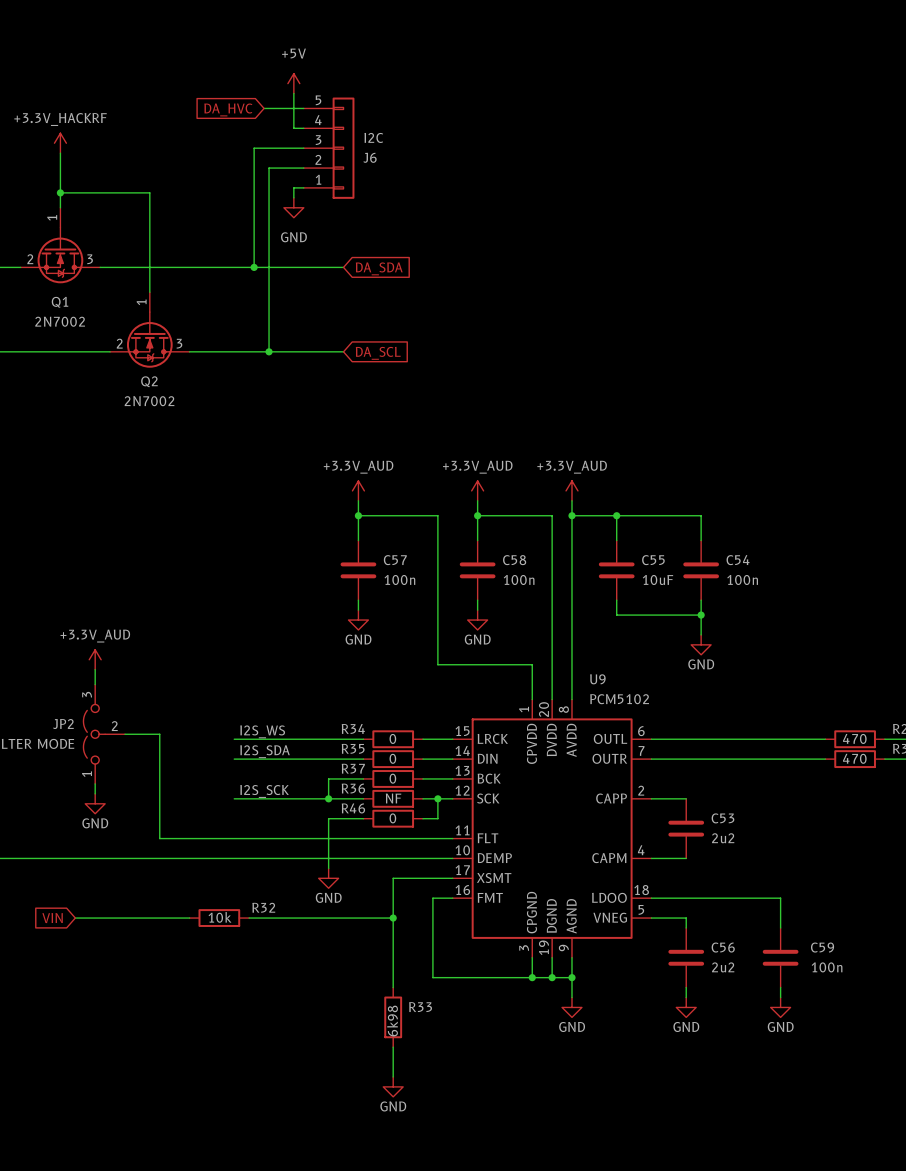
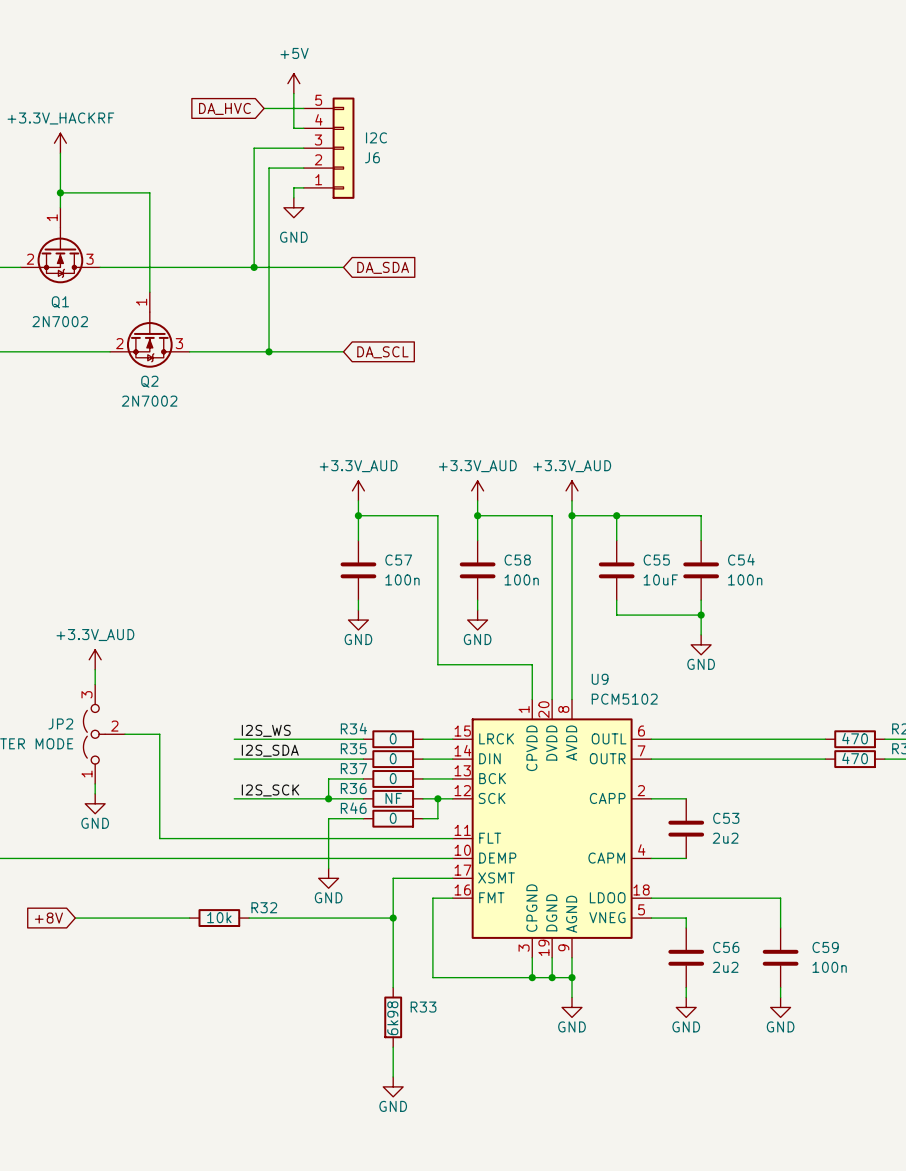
global label: VIN (52, 918) -> +8V (48, 918)

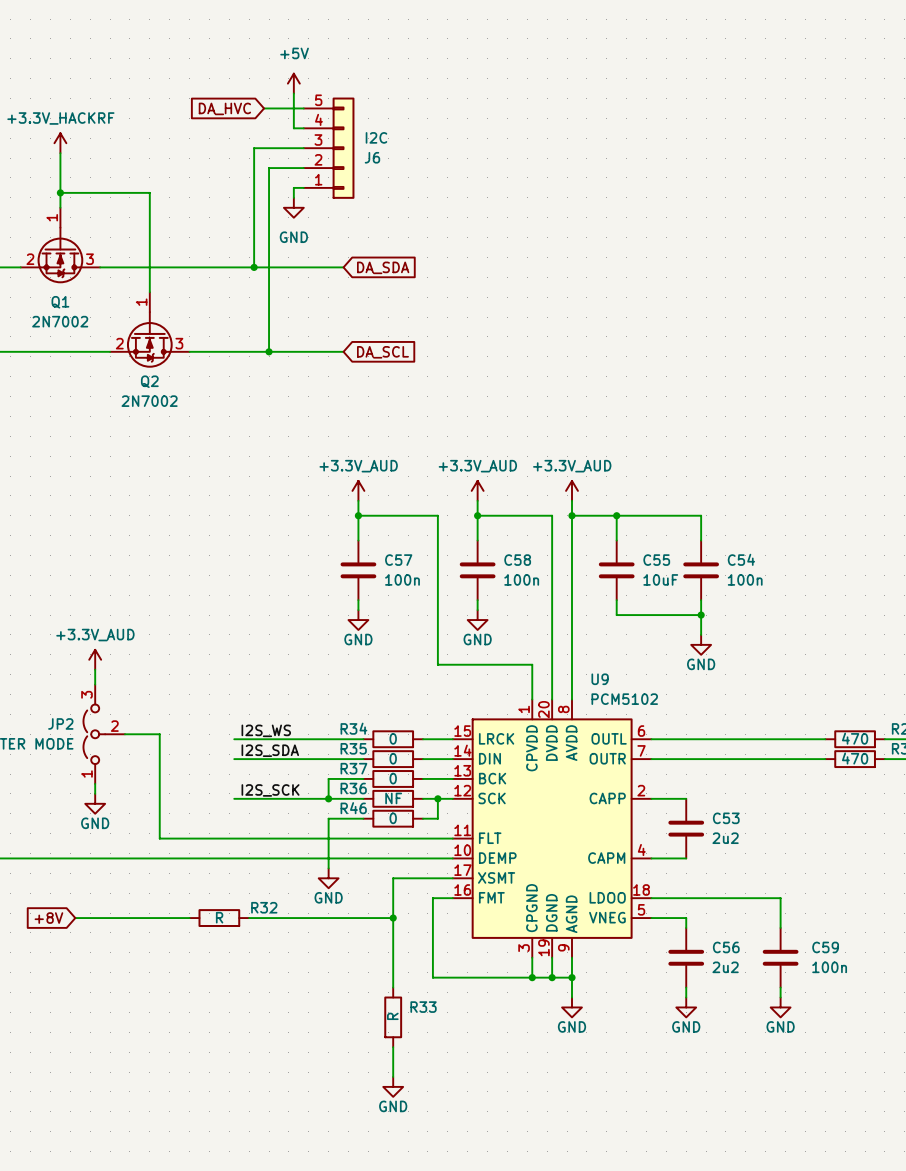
R32 value: 10k (219, 917) -> R (219, 917)
R33 value: 6k98 (392, 1018) -> R (392, 1016)

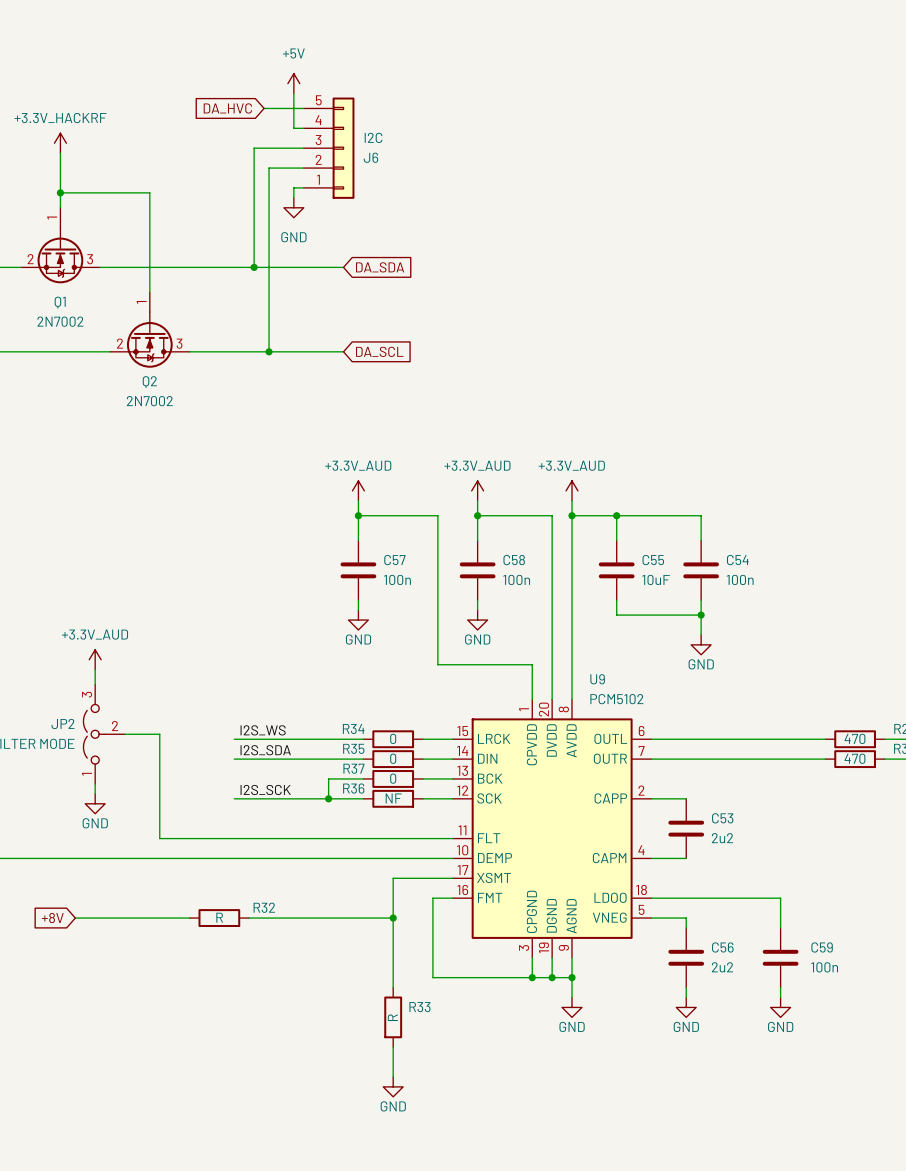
wire: (437, 798) (437, 818) (422, 818) -> none
junction: (437, 798) -> none
wire: (363, 818) (328, 818) (328, 868) -> none
R46: 0 (393, 818) -> none
power symbol: GND (328, 878) -> none

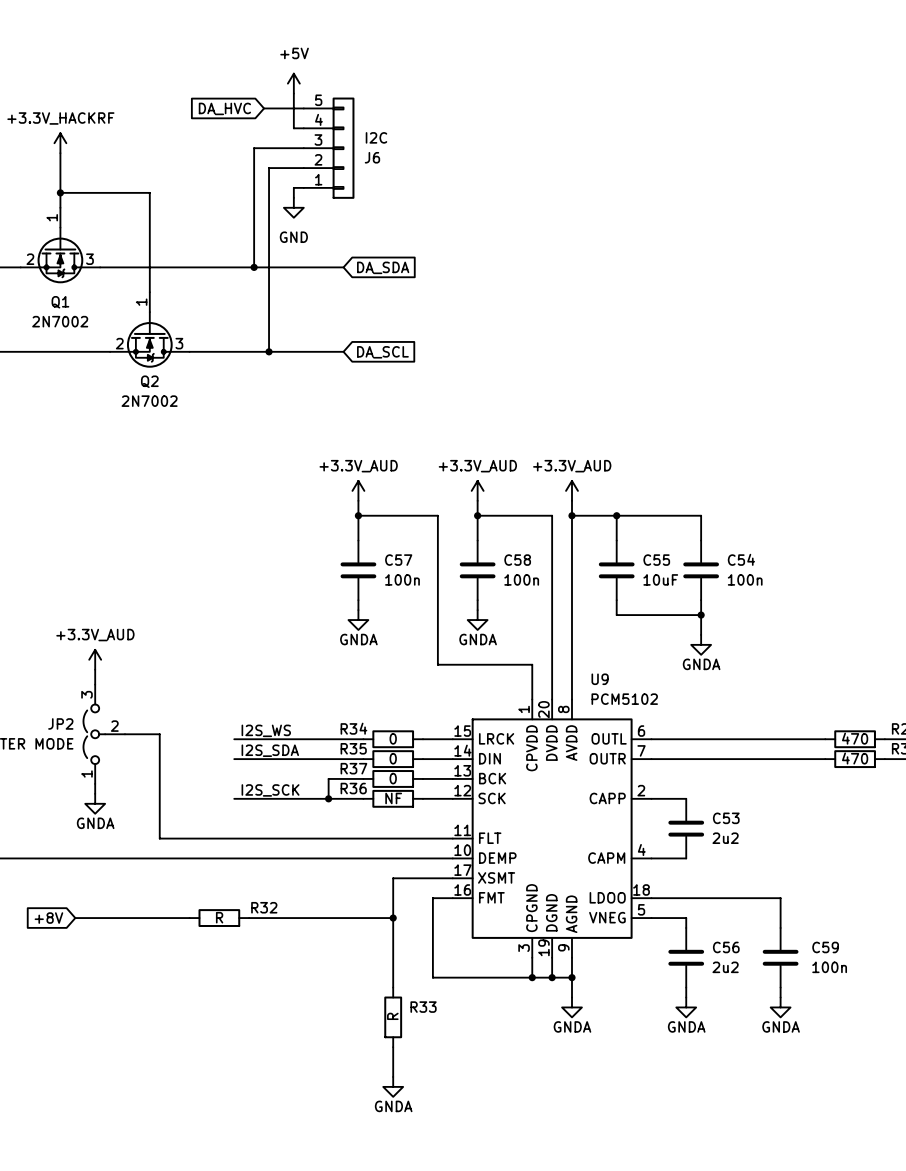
power symbol: GND (358, 620) -> GNDA (358, 620)
power symbol: GND (477, 620) -> GNDA (477, 620)
power symbol: GND (701, 644) -> GNDA (701, 644)
power symbol: GND (95, 803) -> GNDA (95, 803)
power symbol: GND (572, 1007) -> GNDA (572, 1007)
power symbol: GND (686, 1007) -> GNDA (686, 1007)
power symbol: GND (780, 1007) -> GNDA (780, 1007)
power symbol: GND (393, 1086) -> GNDA (393, 1086)

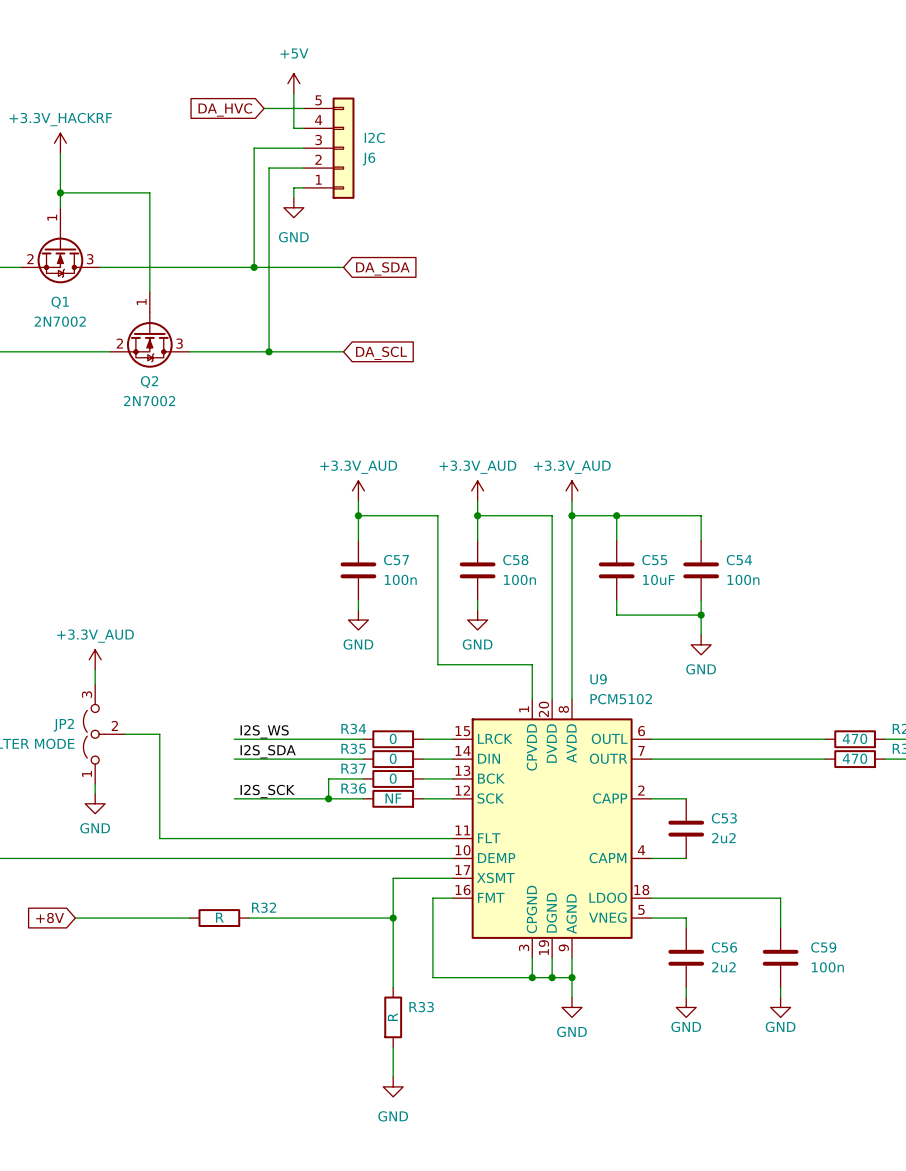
power symbol: GNDA (358, 620) -> GND (358, 620)
power symbol: GNDA (477, 620) -> GND (477, 620)
power symbol: GNDA (701, 644) -> GND (701, 644)
power symbol: GNDA (95, 803) -> GND (95, 803)
power symbol: GNDA (572, 1007) -> GND (572, 1007)
power symbol: GNDA (686, 1007) -> GND (686, 1007)
power symbol: GNDA (780, 1007) -> GND (780, 1007)
power symbol: GNDA (393, 1086) -> GND (393, 1086)

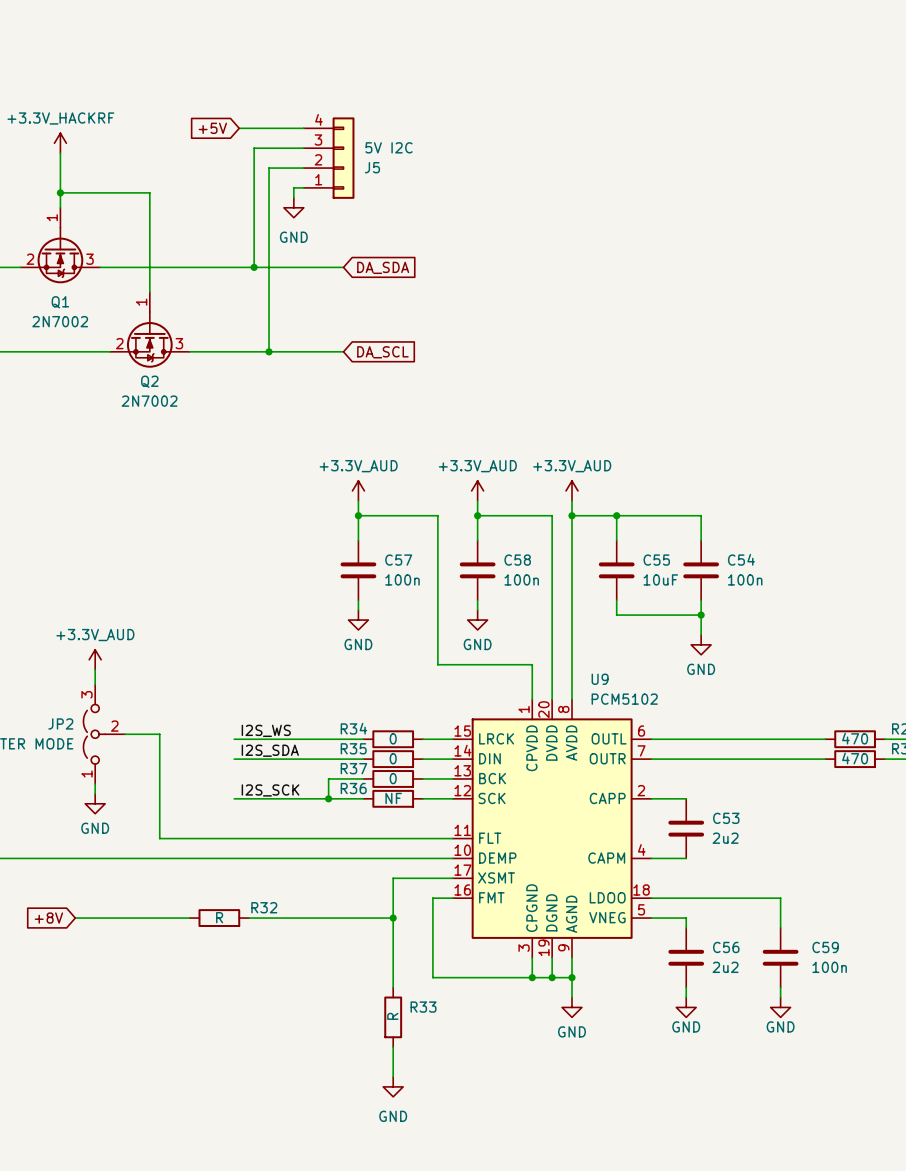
power symbol: +5V (293, 83) -> none
wire: (293, 93) (293, 128) -> (239, 128) (293, 128)
wire: (264, 108) (303, 108) -> none
global label: DA_HVC (225, 109) -> none
global label: none -> +5V (212, 128)
J6: I2C (329, 148) -> none
J5: none -> 5V I2C (329, 158)

